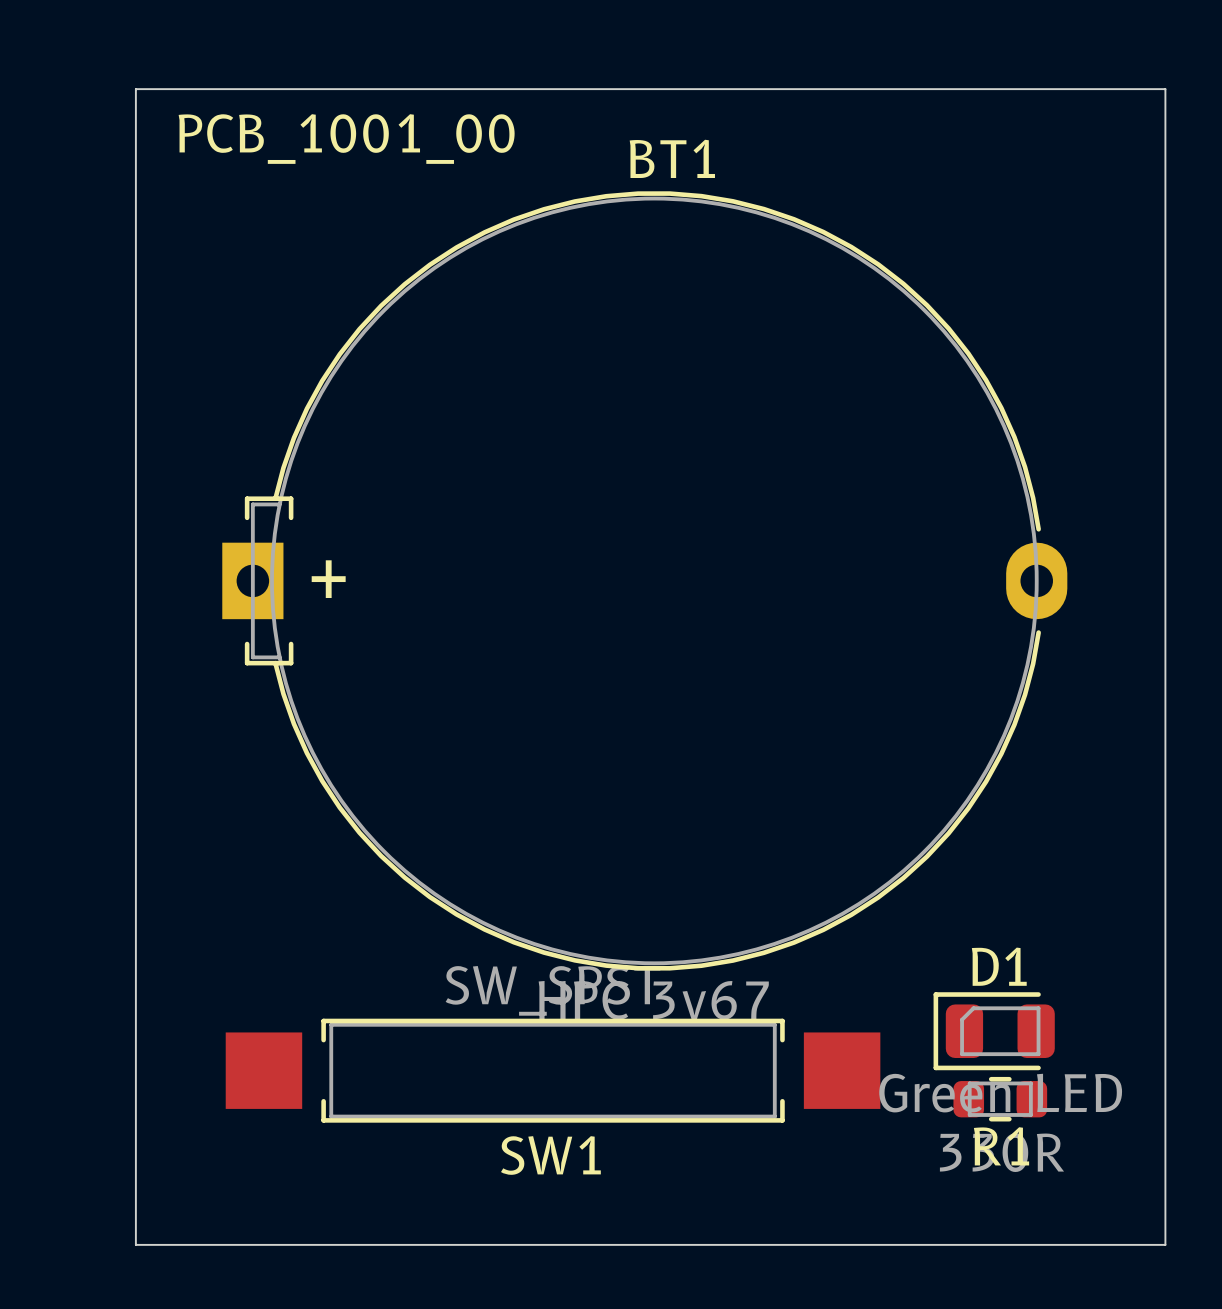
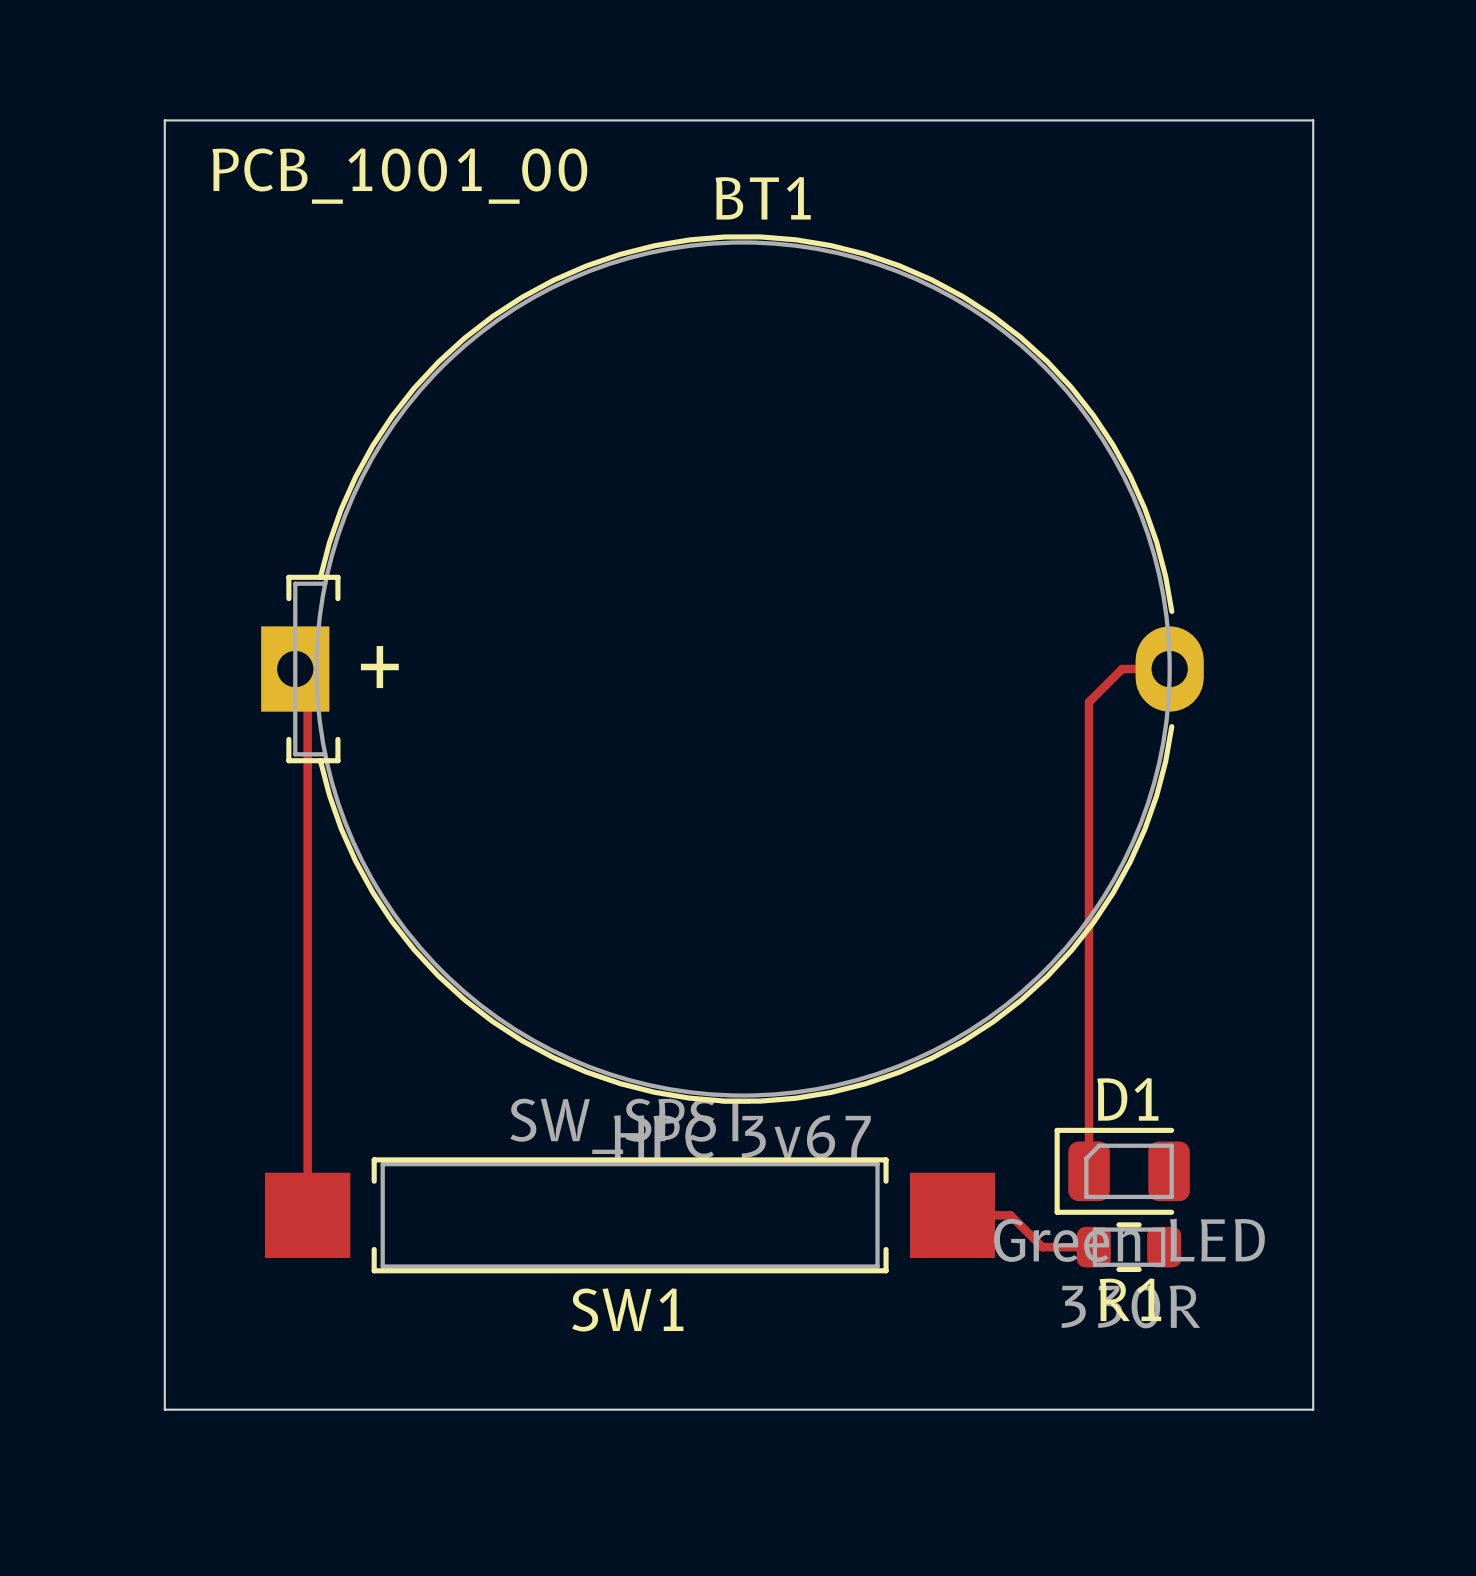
track: none -> (295, 669) (307, 681) (307, 1215)
track: none -> (1169, 669) (1122, 669) (1089, 702) (1089, 1171)
track: none -> (952, 1215) (1010, 1215) (1042, 1247) (1093, 1247)

